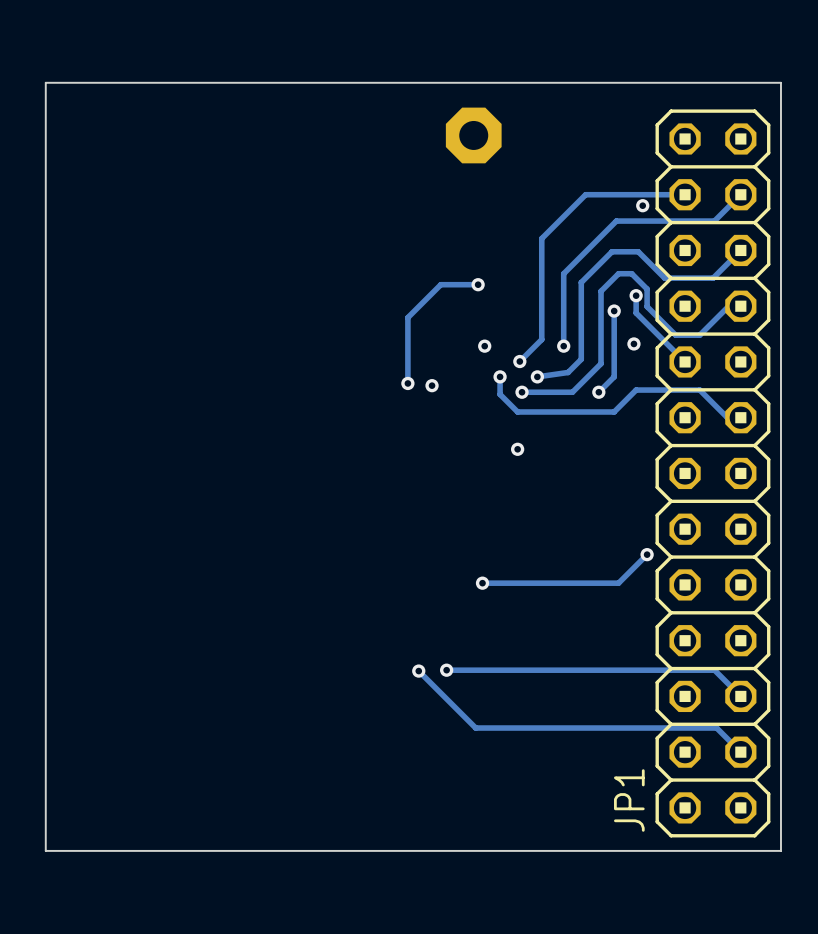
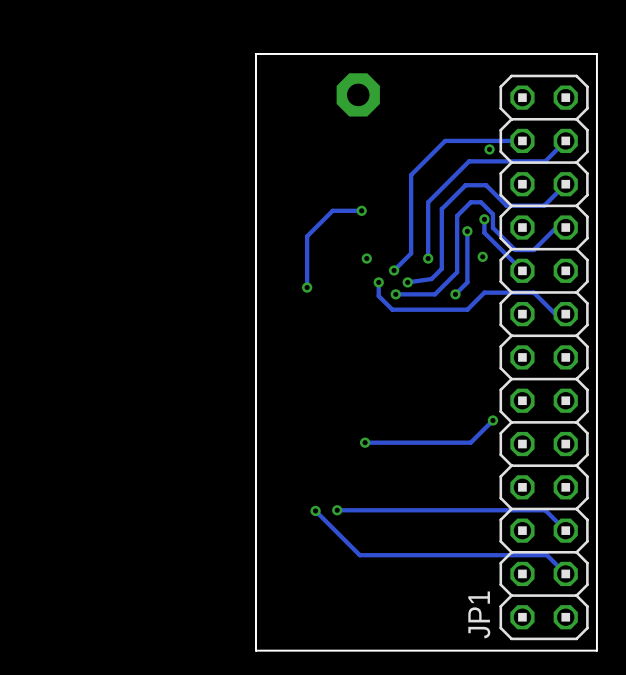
board edge: (342, 82) (45, 82) (45, 850) (342, 850) -> (255, 53) (255, 650)
via: (432, 385) -> none
via: (517, 449) -> none

